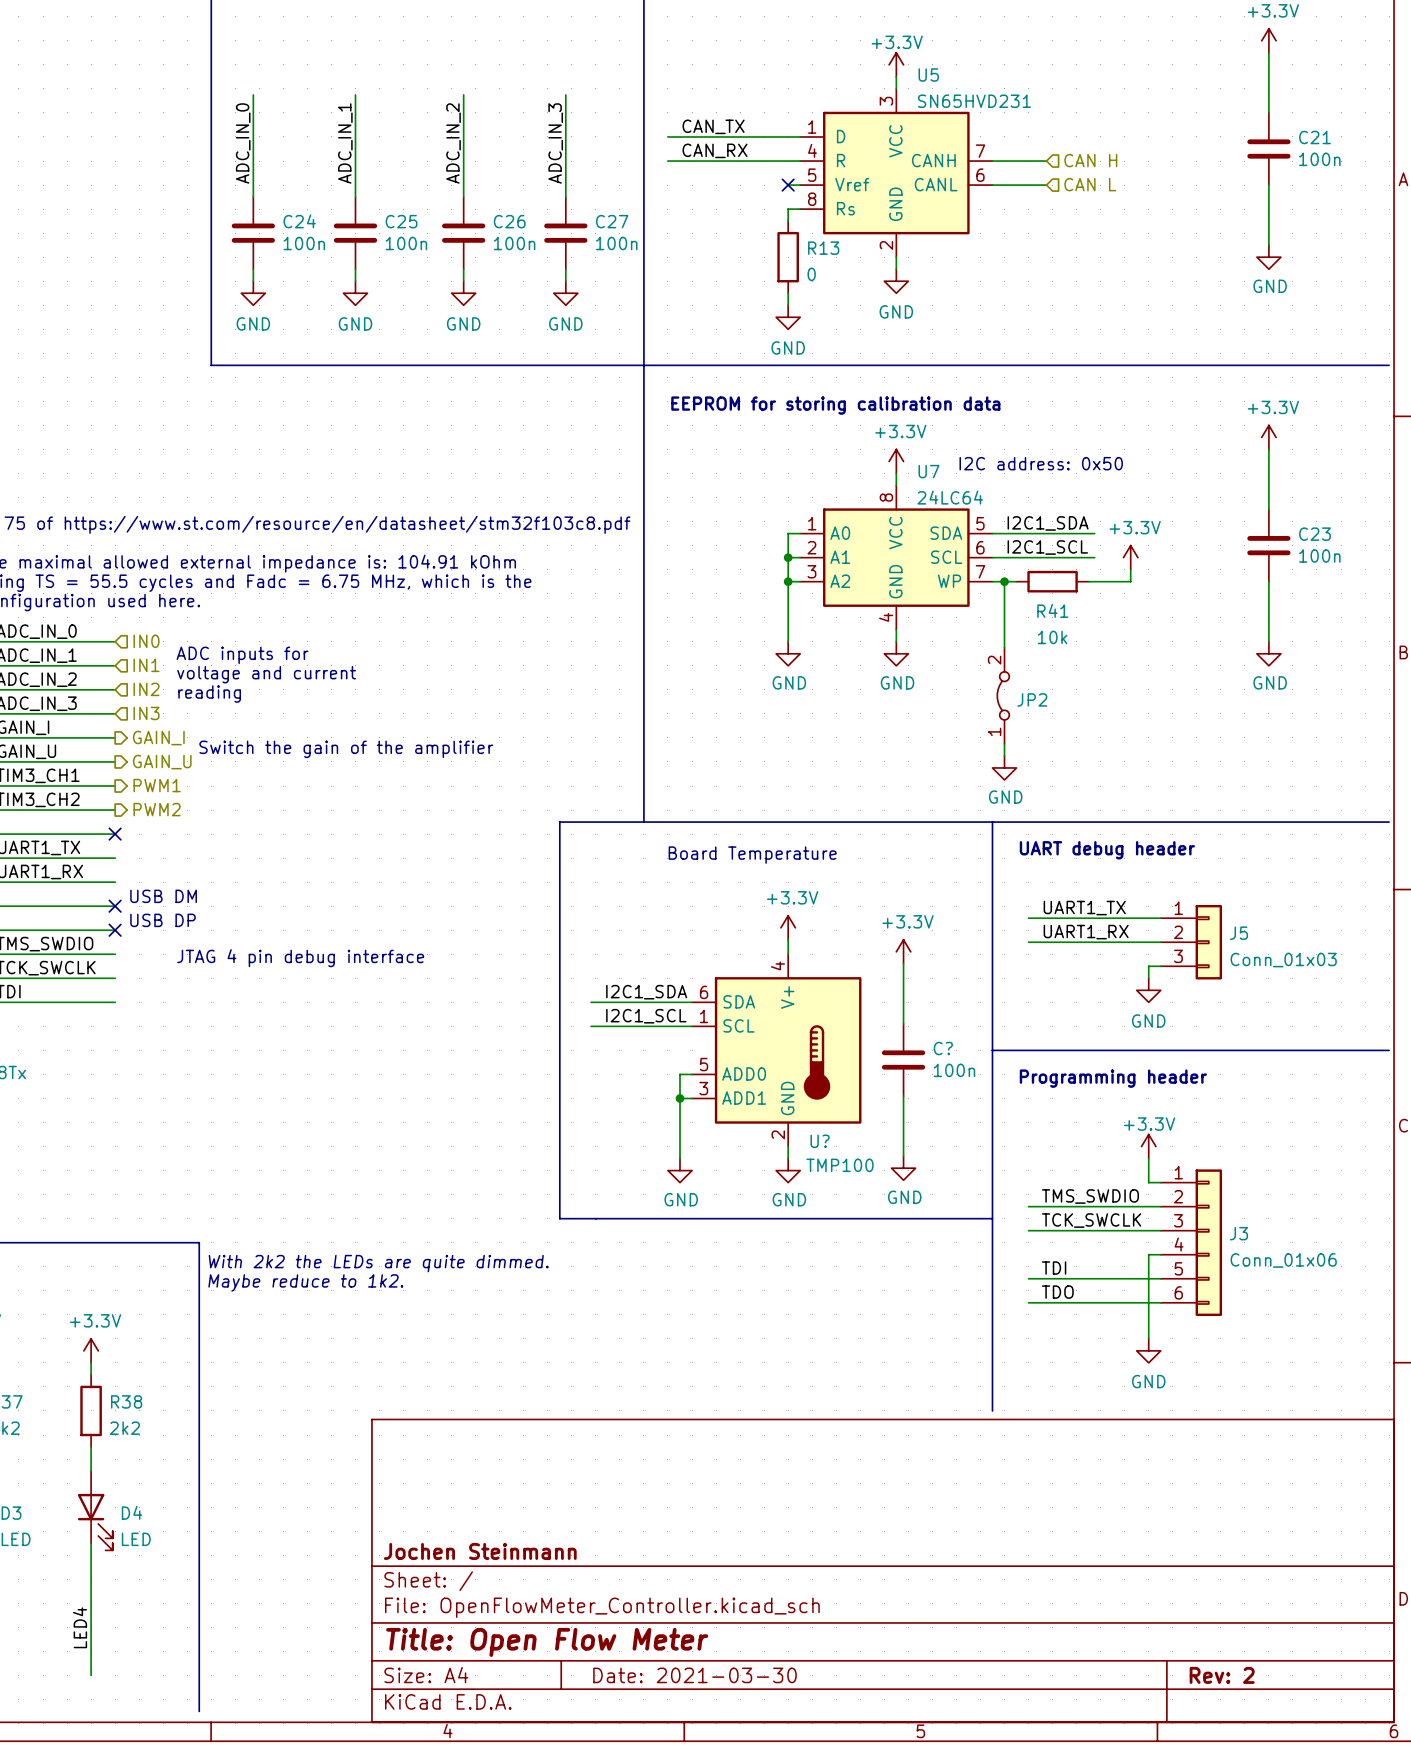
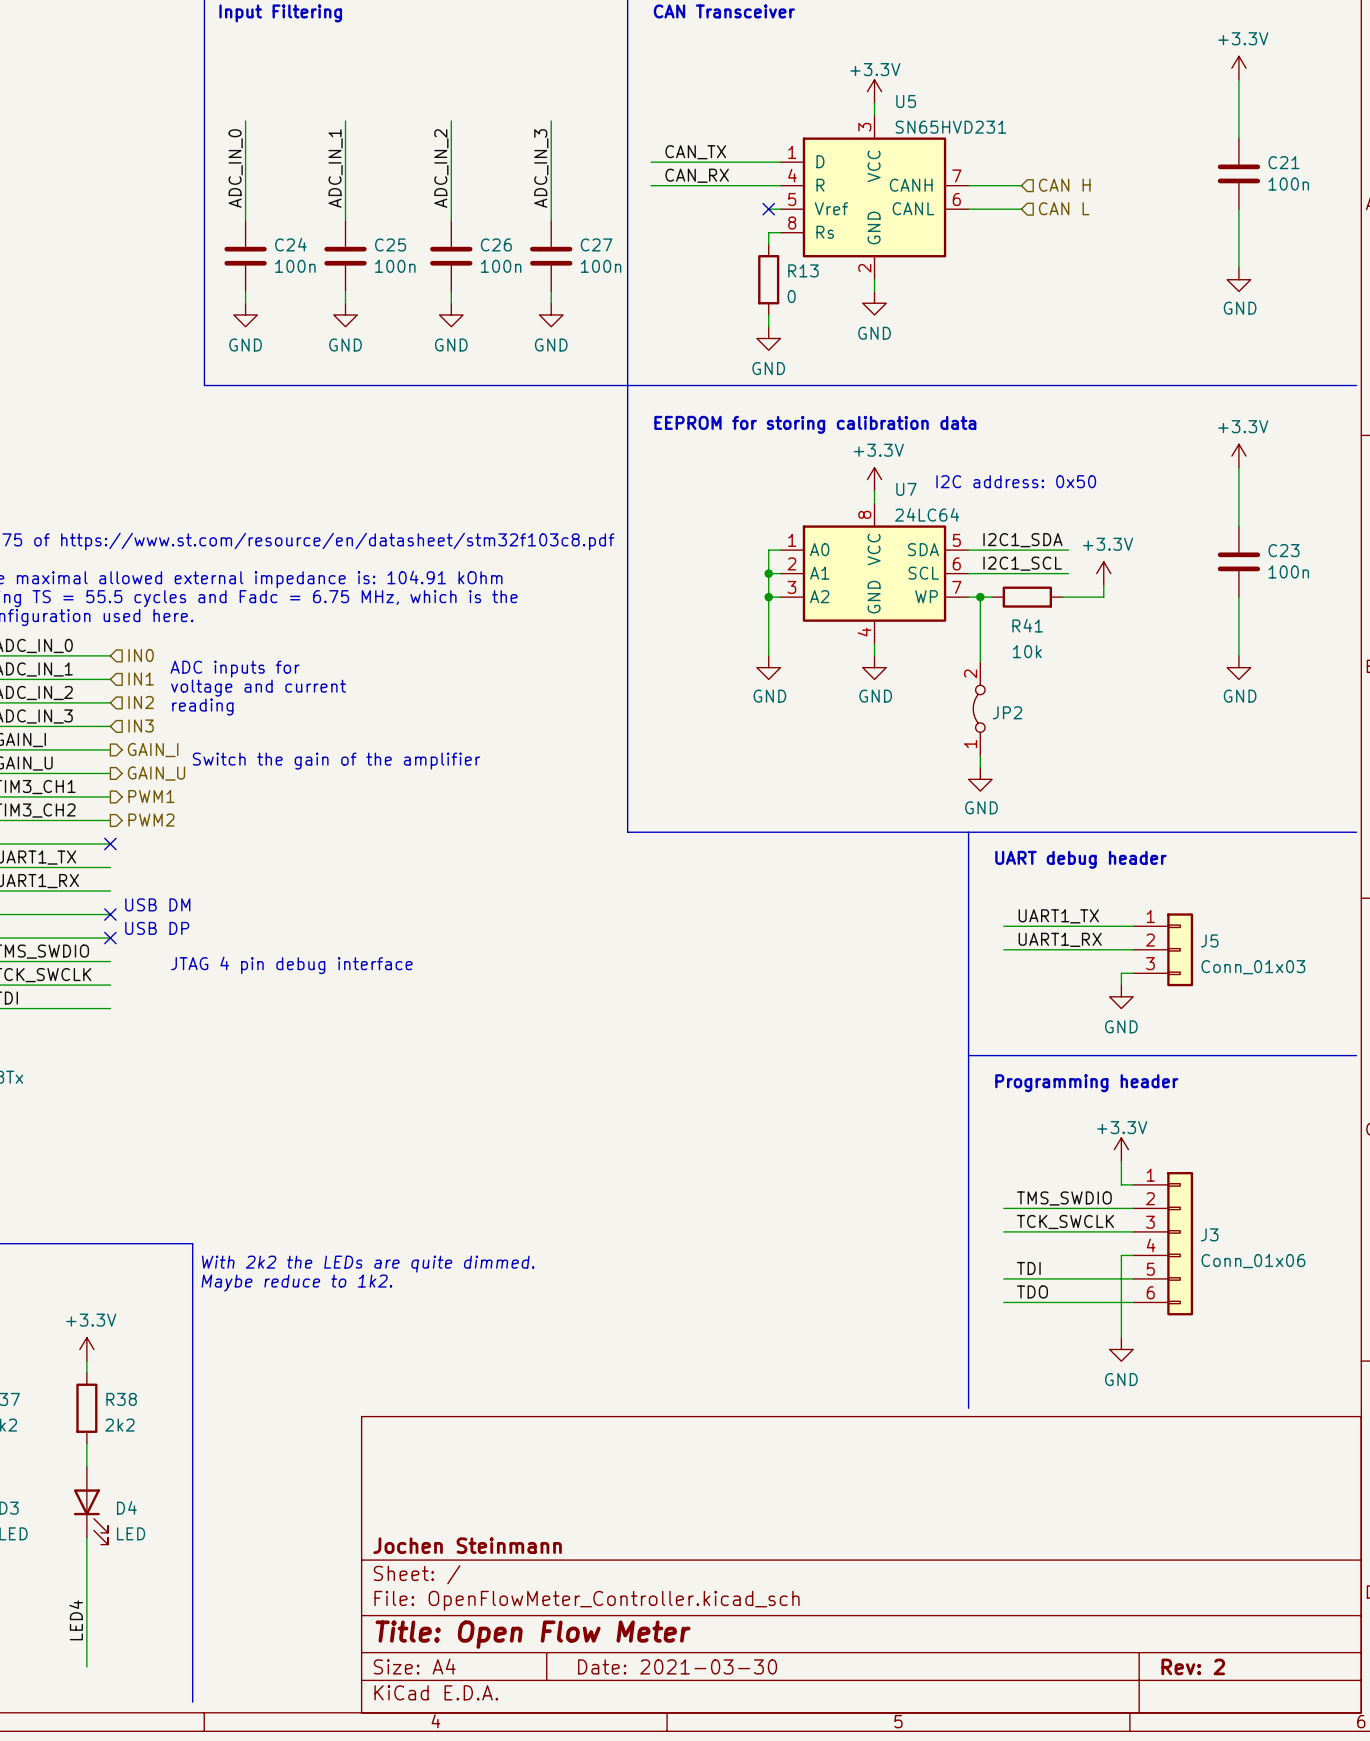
line: (643, 822) (559, 822) (559, 1218) (992, 1218) -> none
text: Board Temperature (752, 855) -> none
power symbol: +3.3V (788, 927) -> none
wire: (788, 939) (788, 954) -> none
power symbol: +3.3V (903, 951) -> none
wire: (903, 963) (903, 1023) -> none
label: I2C1_SDA (646, 992) -> none
wire: (591, 1002) (692, 1002) -> none
label: I2C1_SCL (646, 1016) -> none
wire: (591, 1026) (692, 1026) -> none
U?: TMP100 (776, 1050) -> none
C?: 100n (903, 1060) -> none
wire: (692, 1074) (680, 1074) (680, 1158) -> none
wire: (903, 1096) (903, 1156) -> none
wire: (680, 1098) (692, 1098) -> none
junction: (680, 1098) -> none
wire: (788, 1146) (788, 1158) -> none
power symbol: GND (903, 1168) -> none
power symbol: GND (680, 1170) -> none
power symbol: GND (788, 1170) -> none

